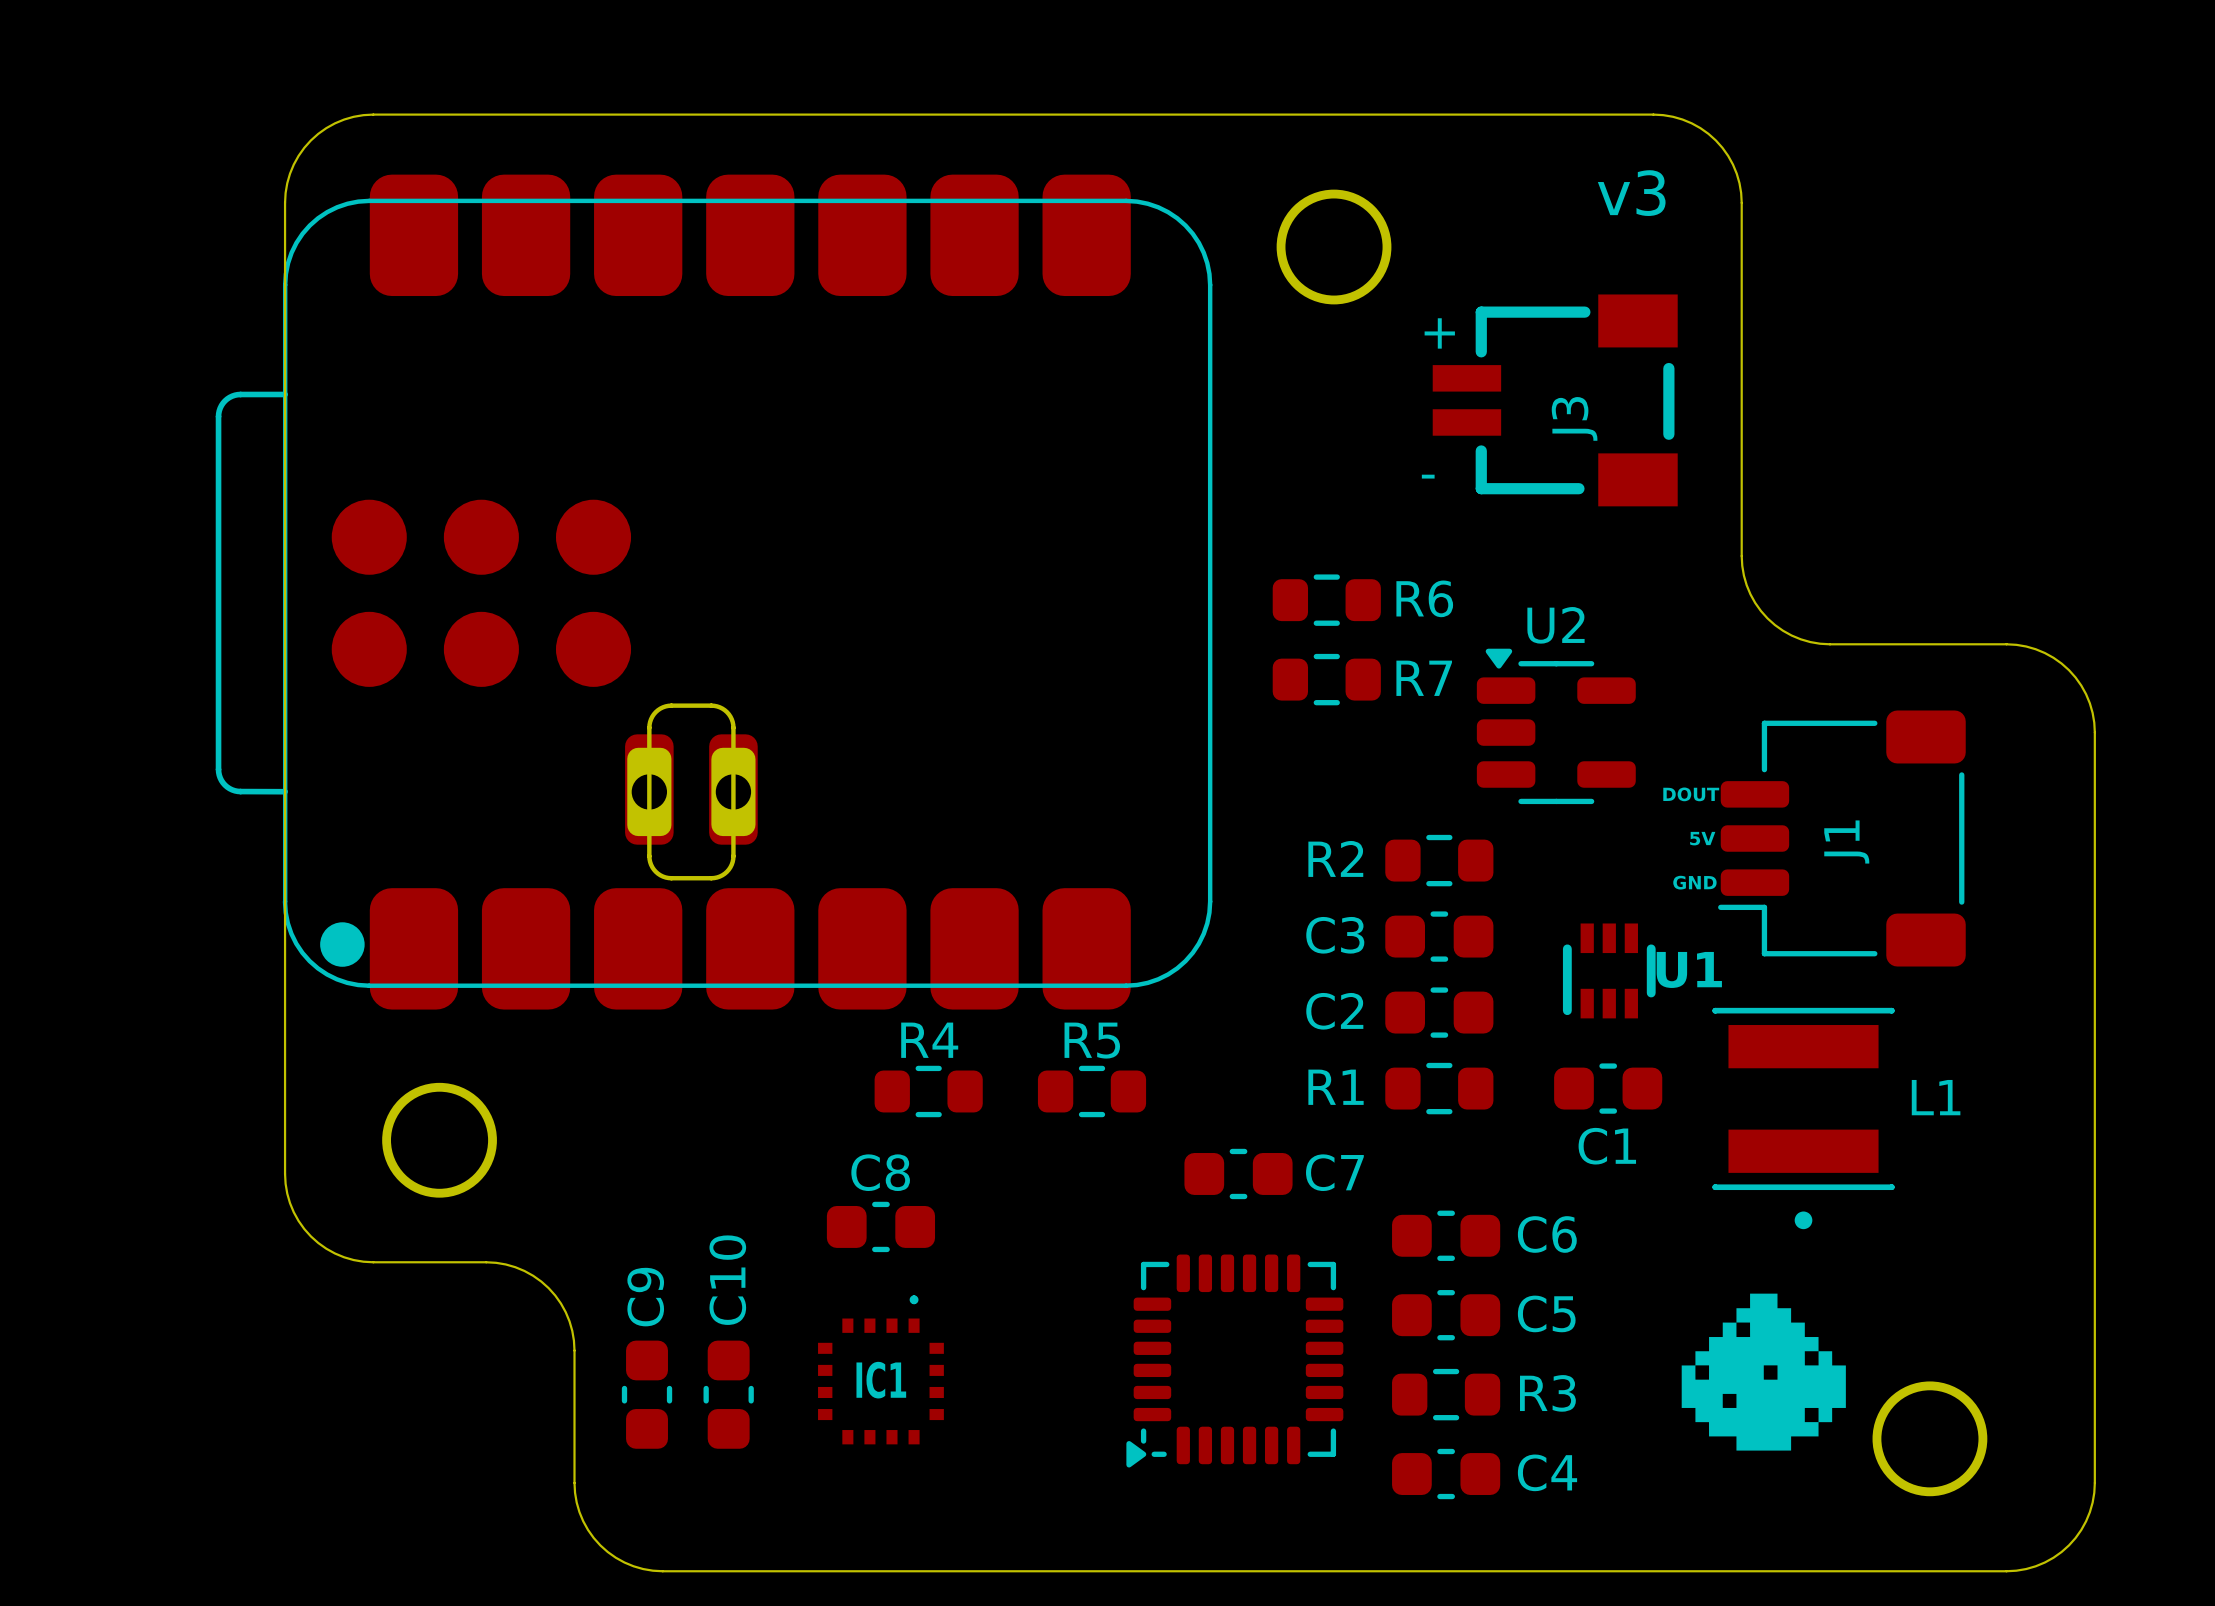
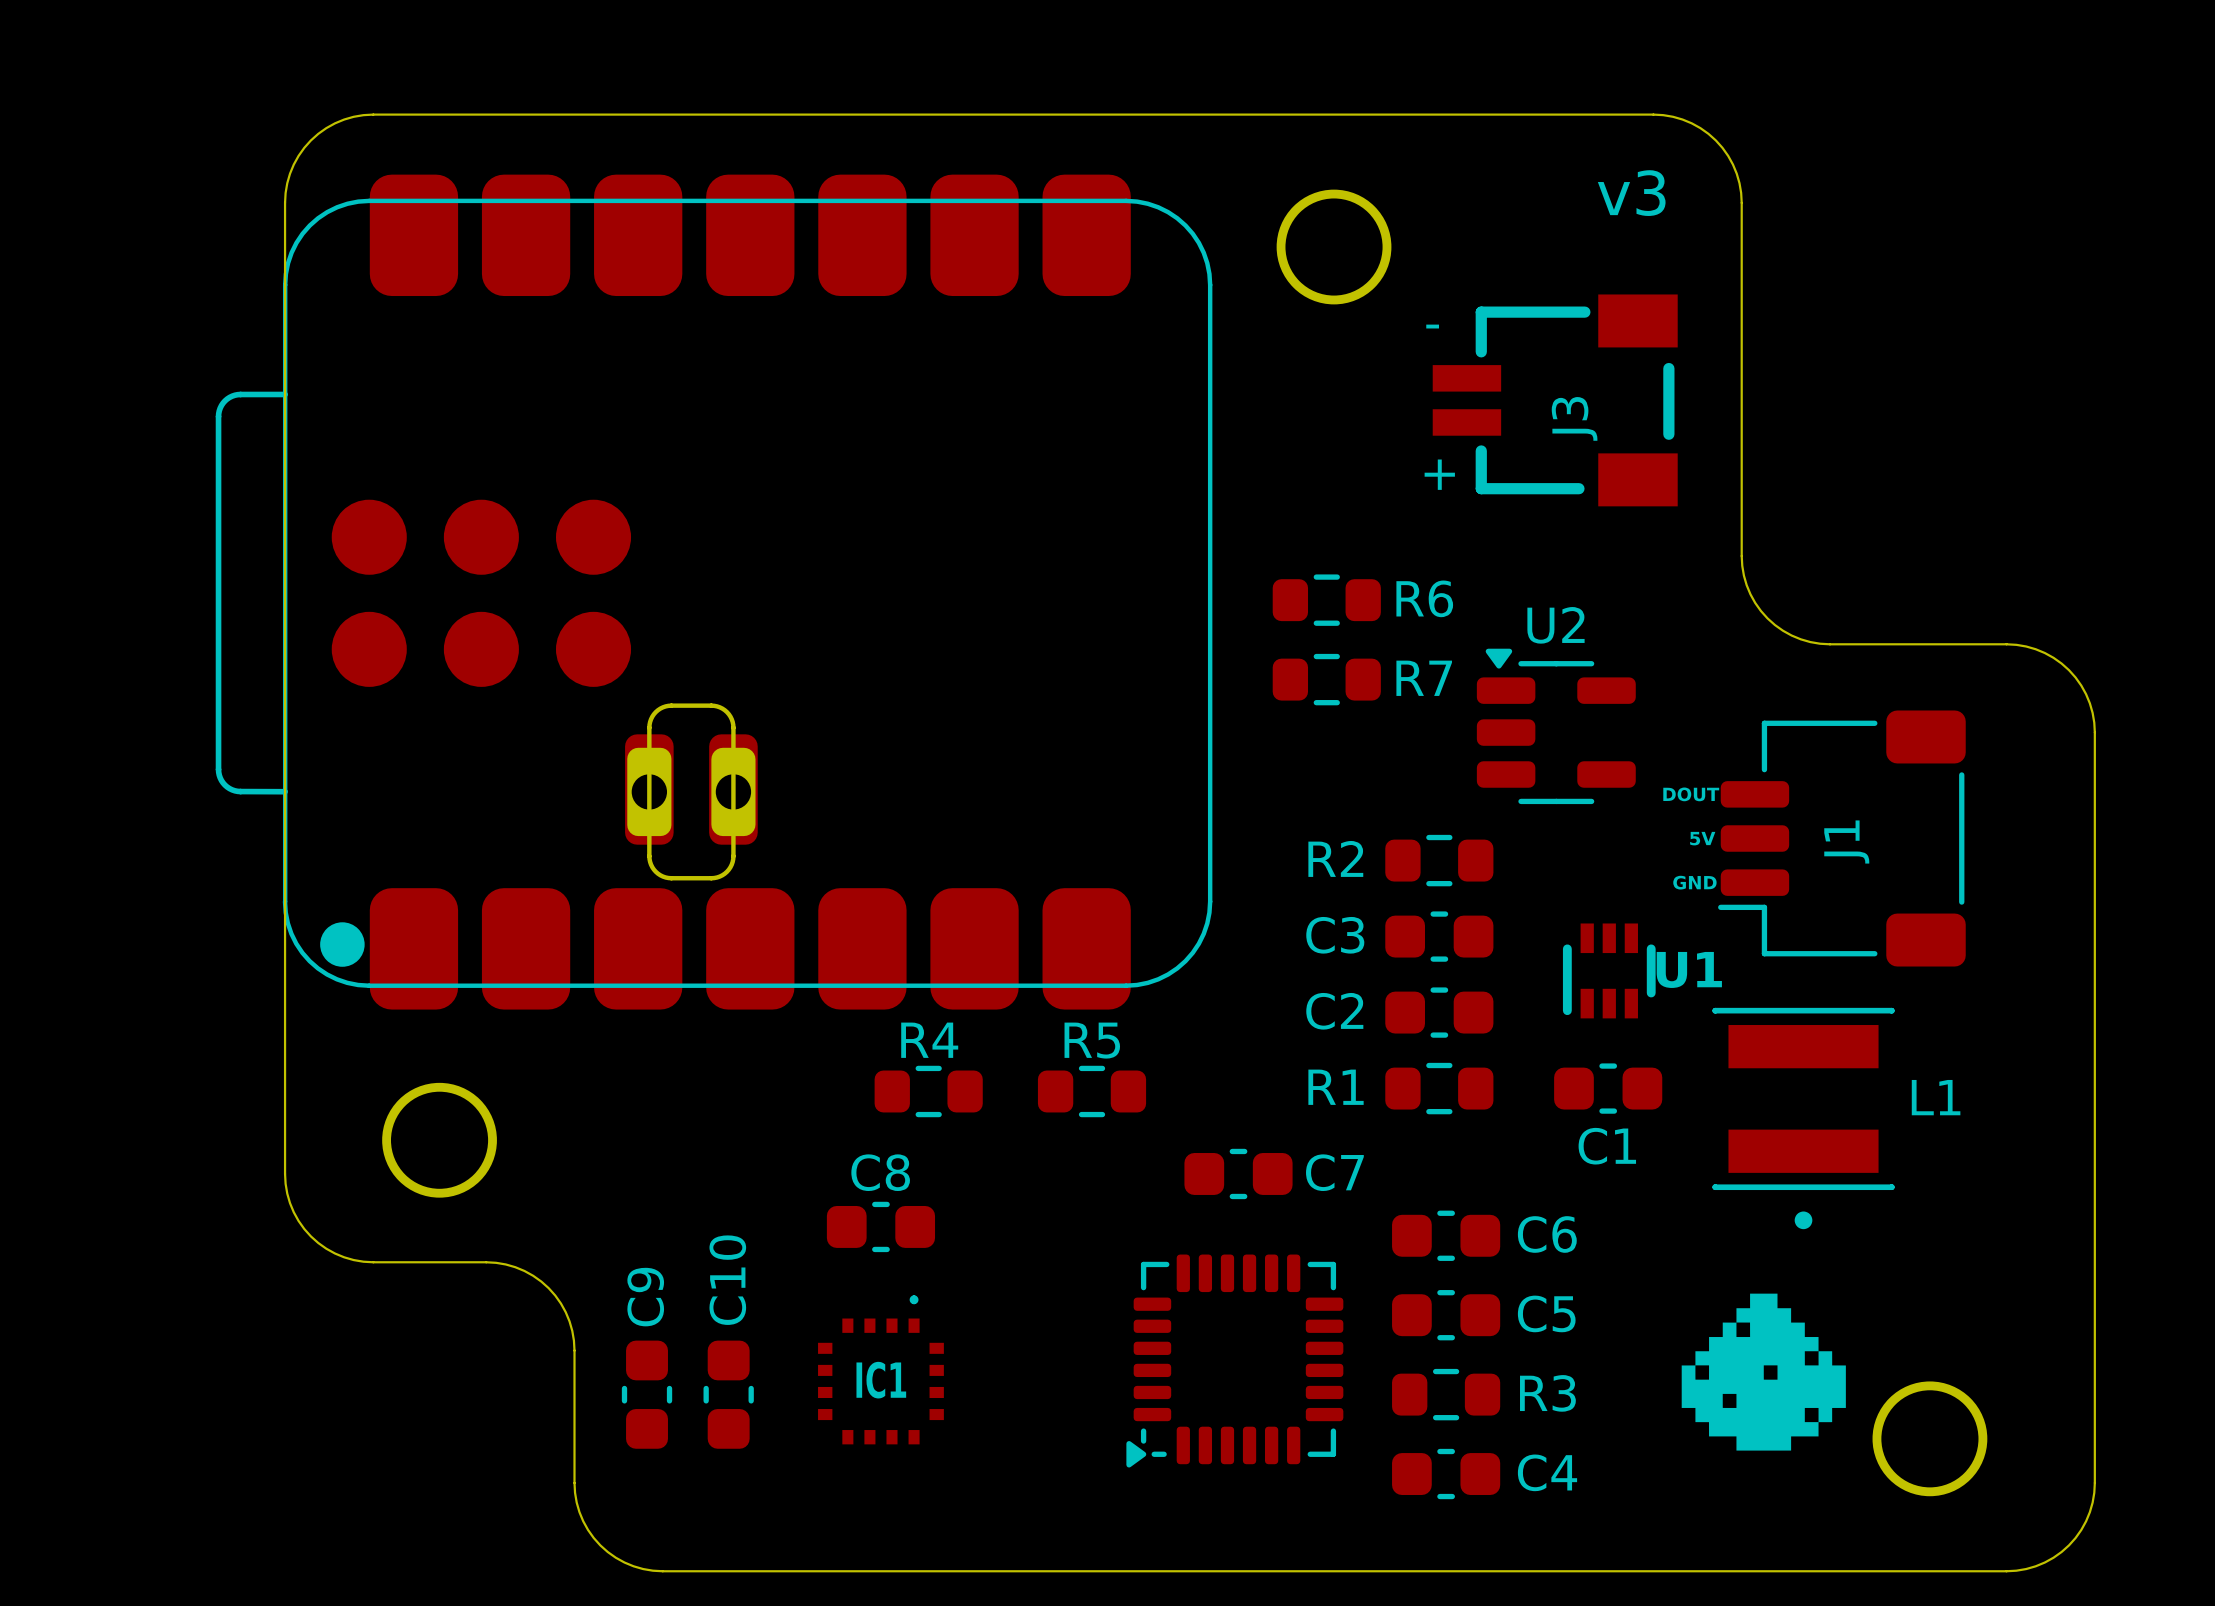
text: + (1439, 333) -> - (1432, 326)
text: - (1428, 476) -> + (1439, 474)

